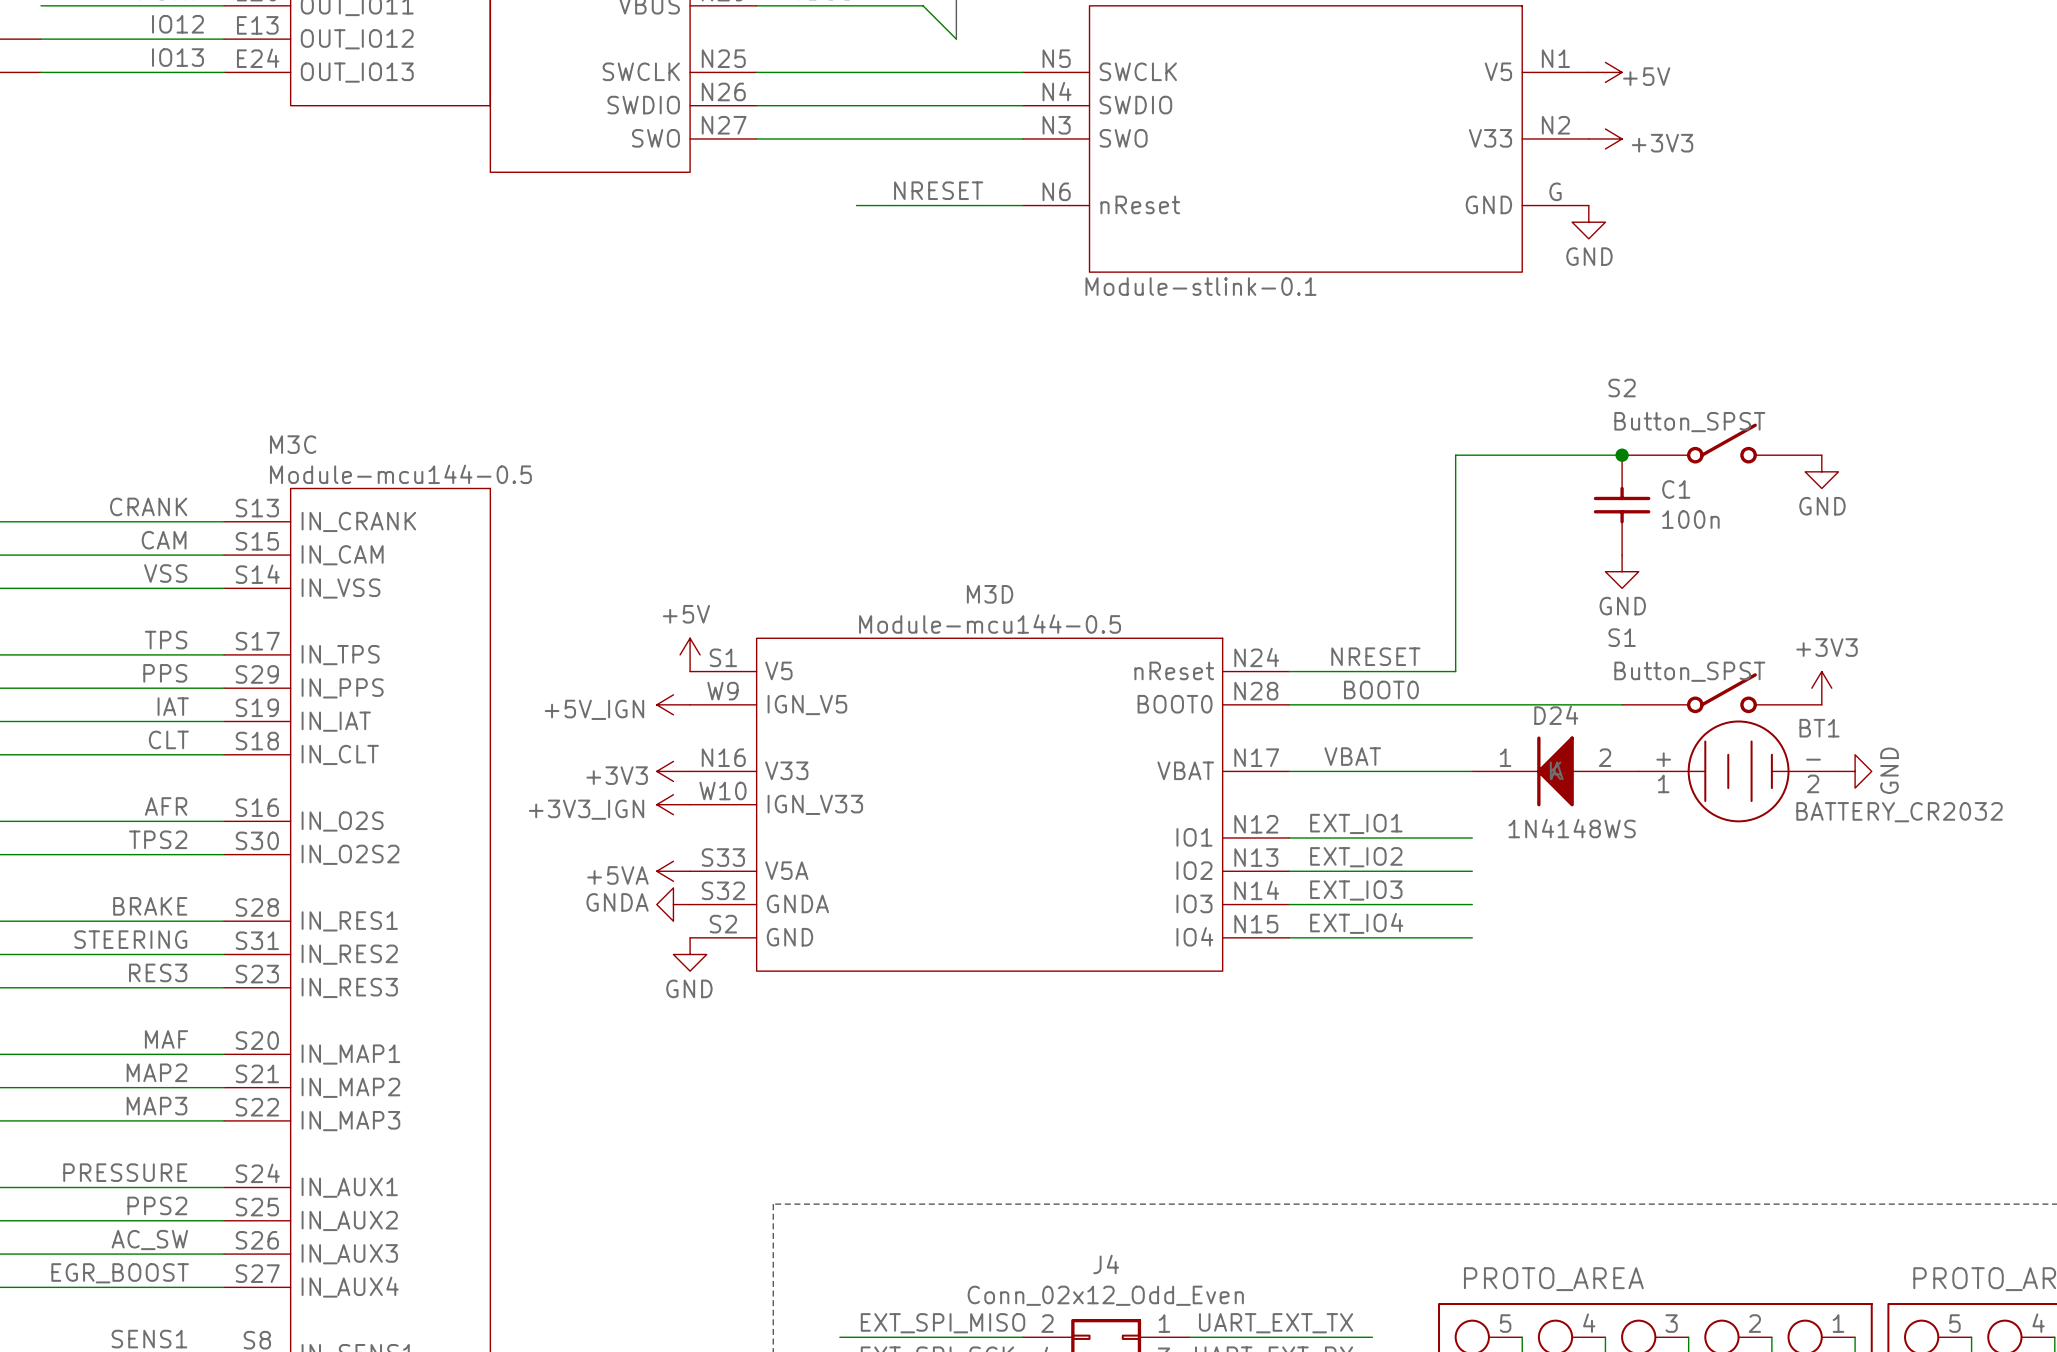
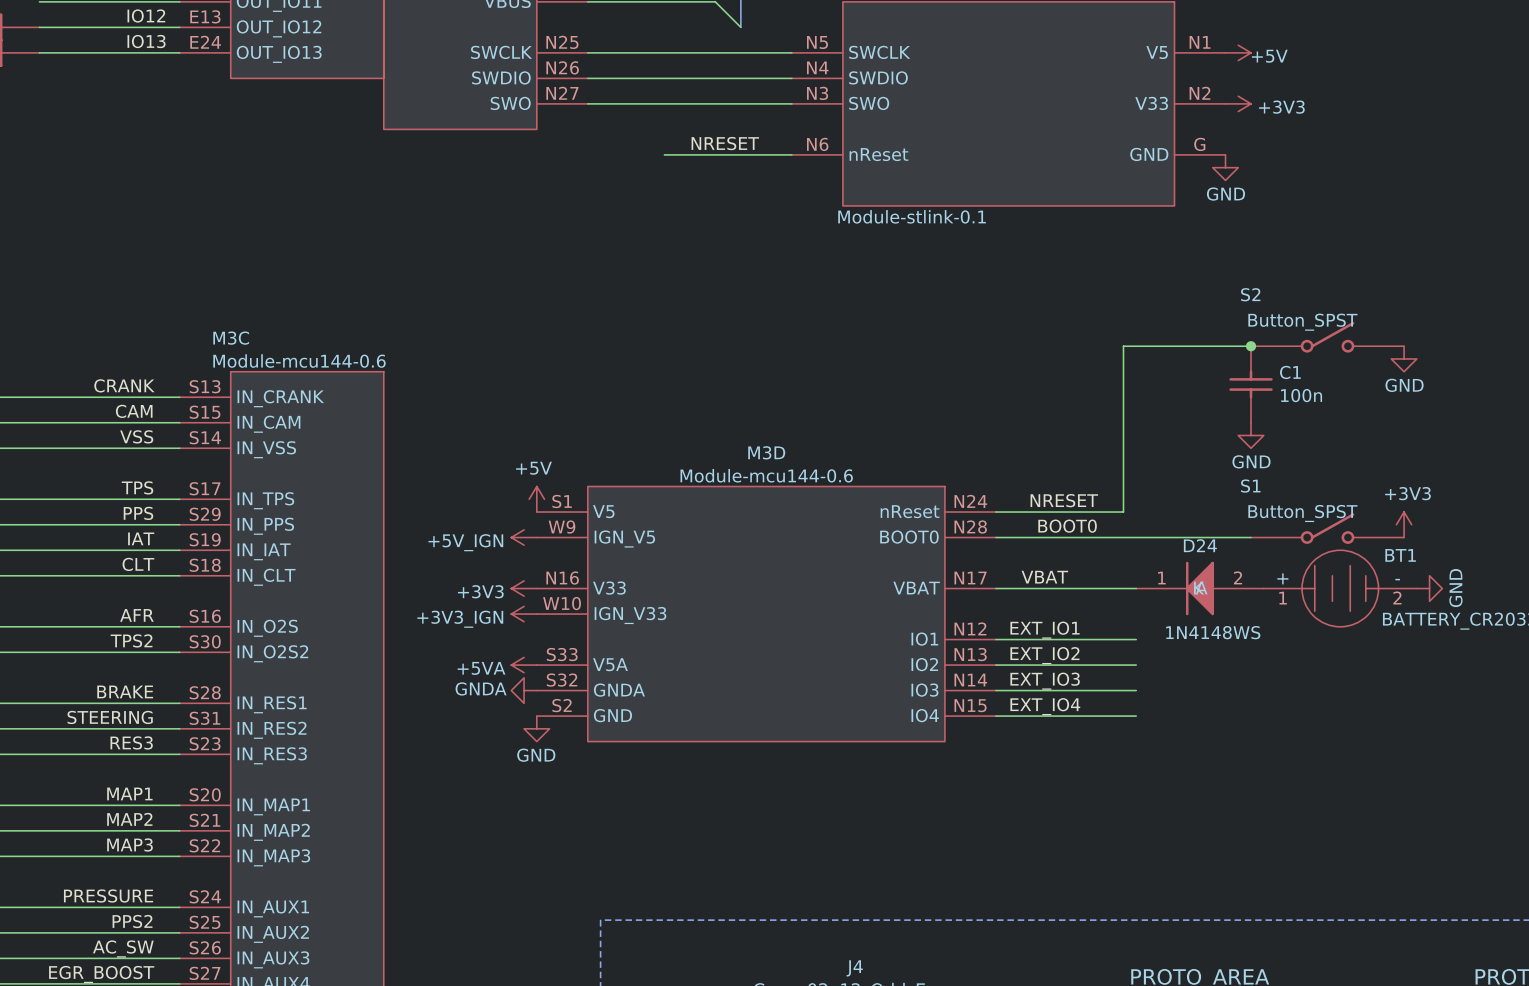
M3C value: Module-mcu144-0.5 (400, 474) -> Module-mcu144-0.6 (299, 361)
M3D value: Module-mcu144-0.5 (990, 624) -> Module-mcu144-0.6 (766, 475)
label: MAF (166, 1039) -> MAP1 (129, 793)

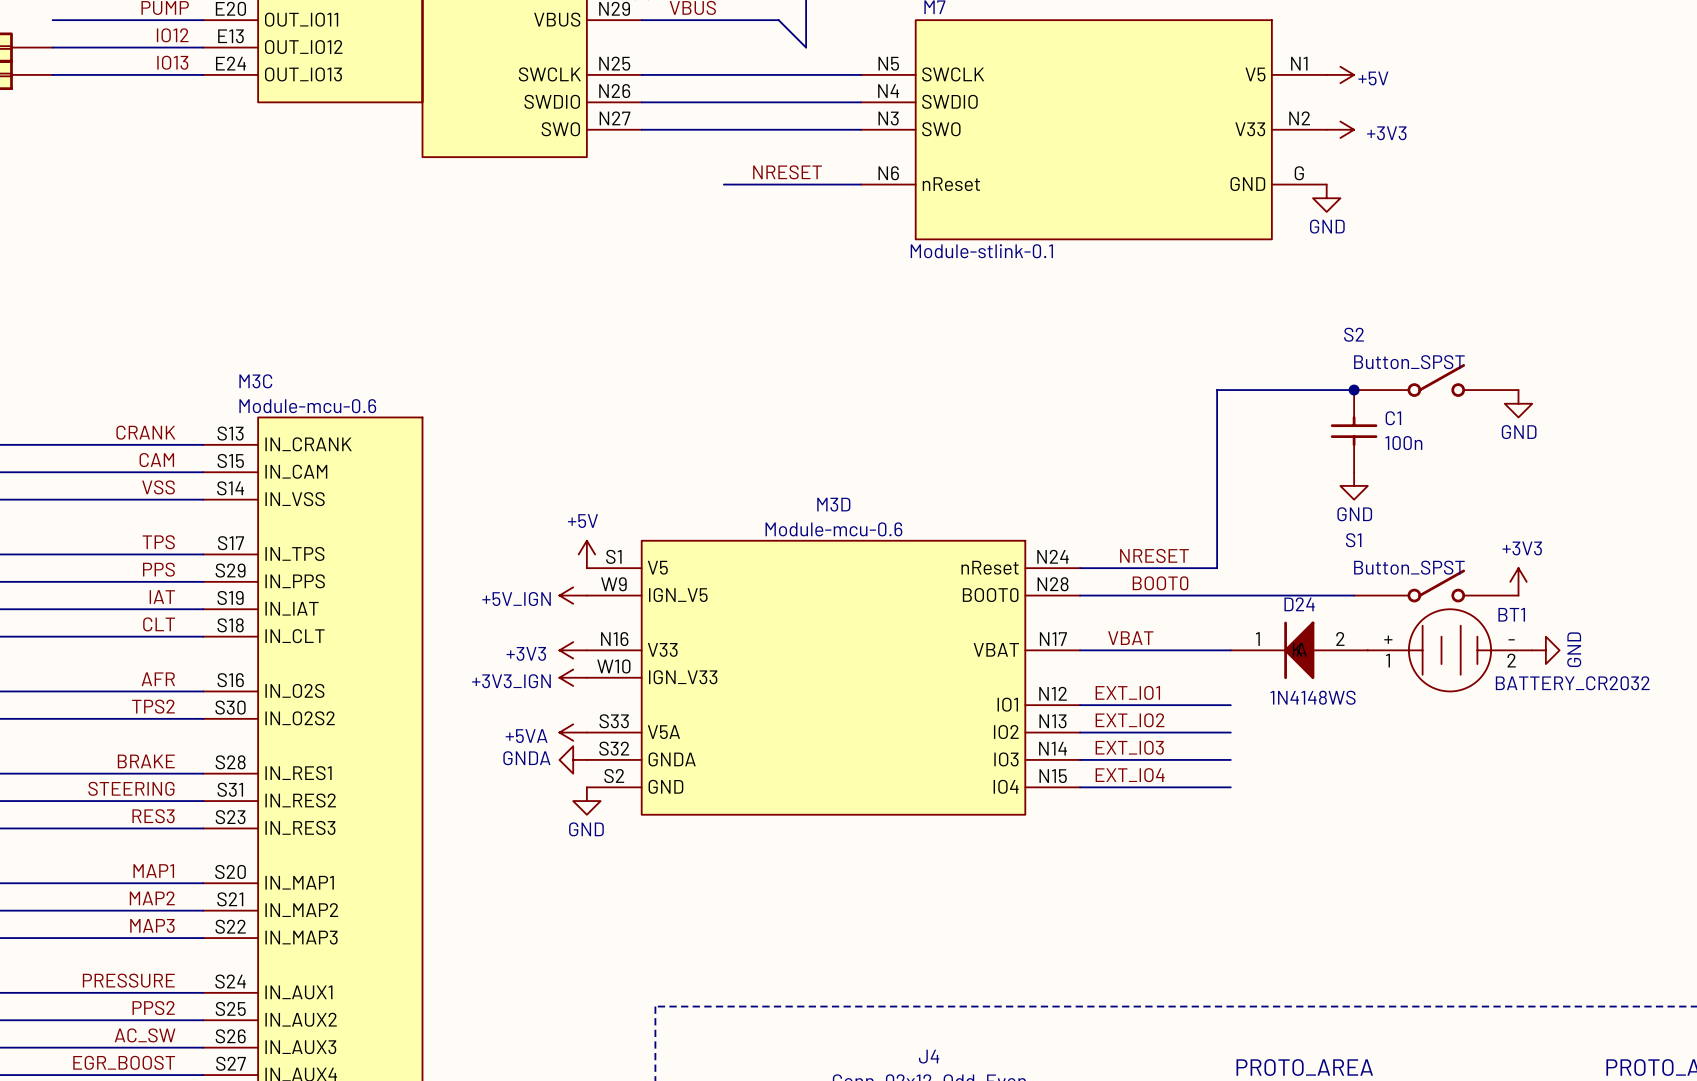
M3C value: Module-mcu144-0.6 (299, 361) -> Module-mcu-0.6 (307, 406)
M3D value: Module-mcu144-0.6 (766, 475) -> Module-mcu-0.6 (833, 529)

